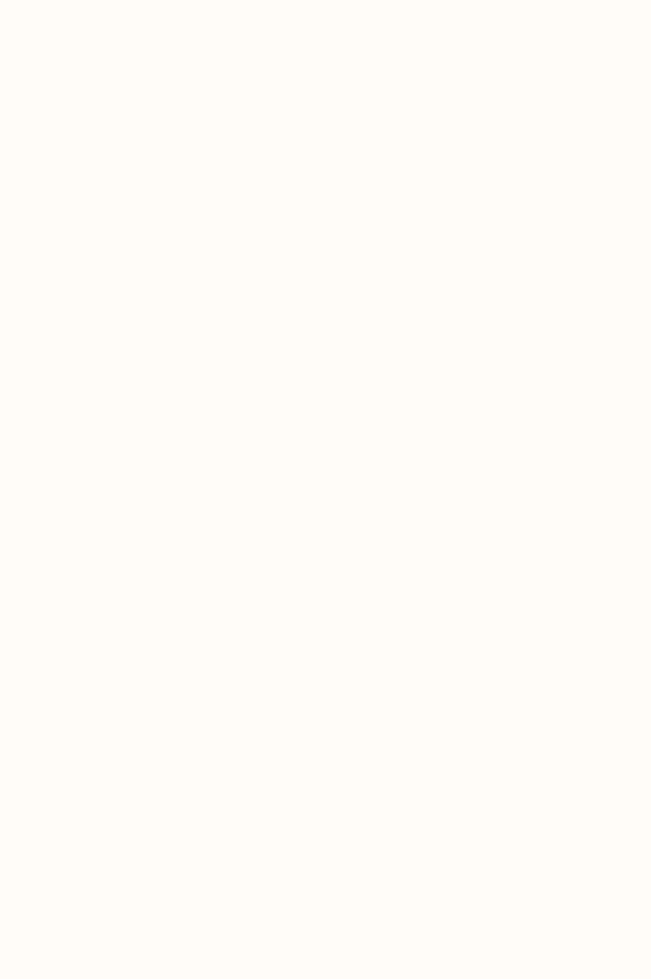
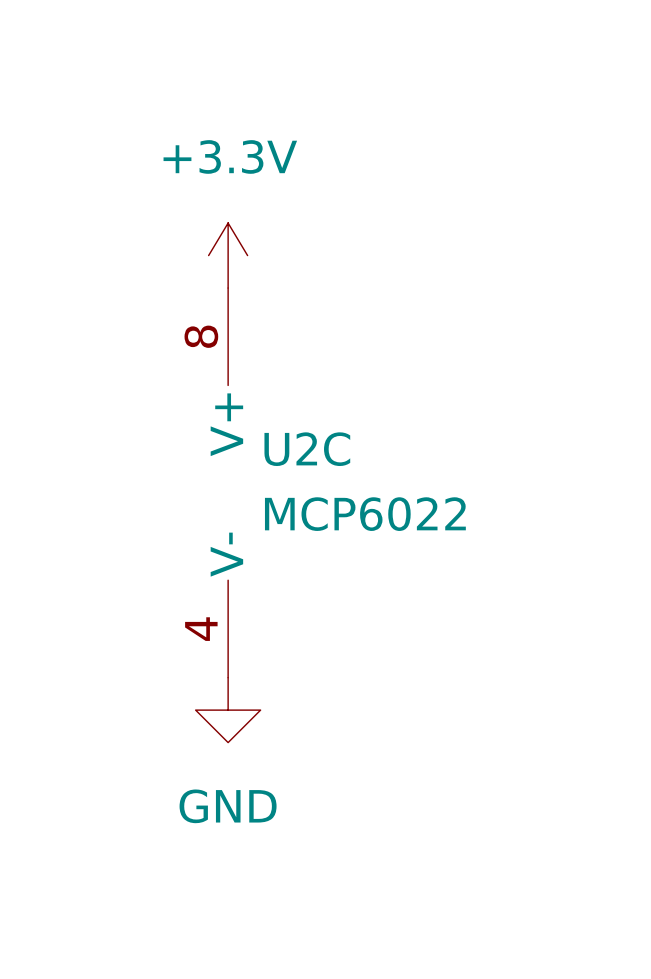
power symbol: none -> +3.3V (228, 255)
U2C: none -> MCP6022 (228, 482)
power symbol: none -> GND (228, 710)

